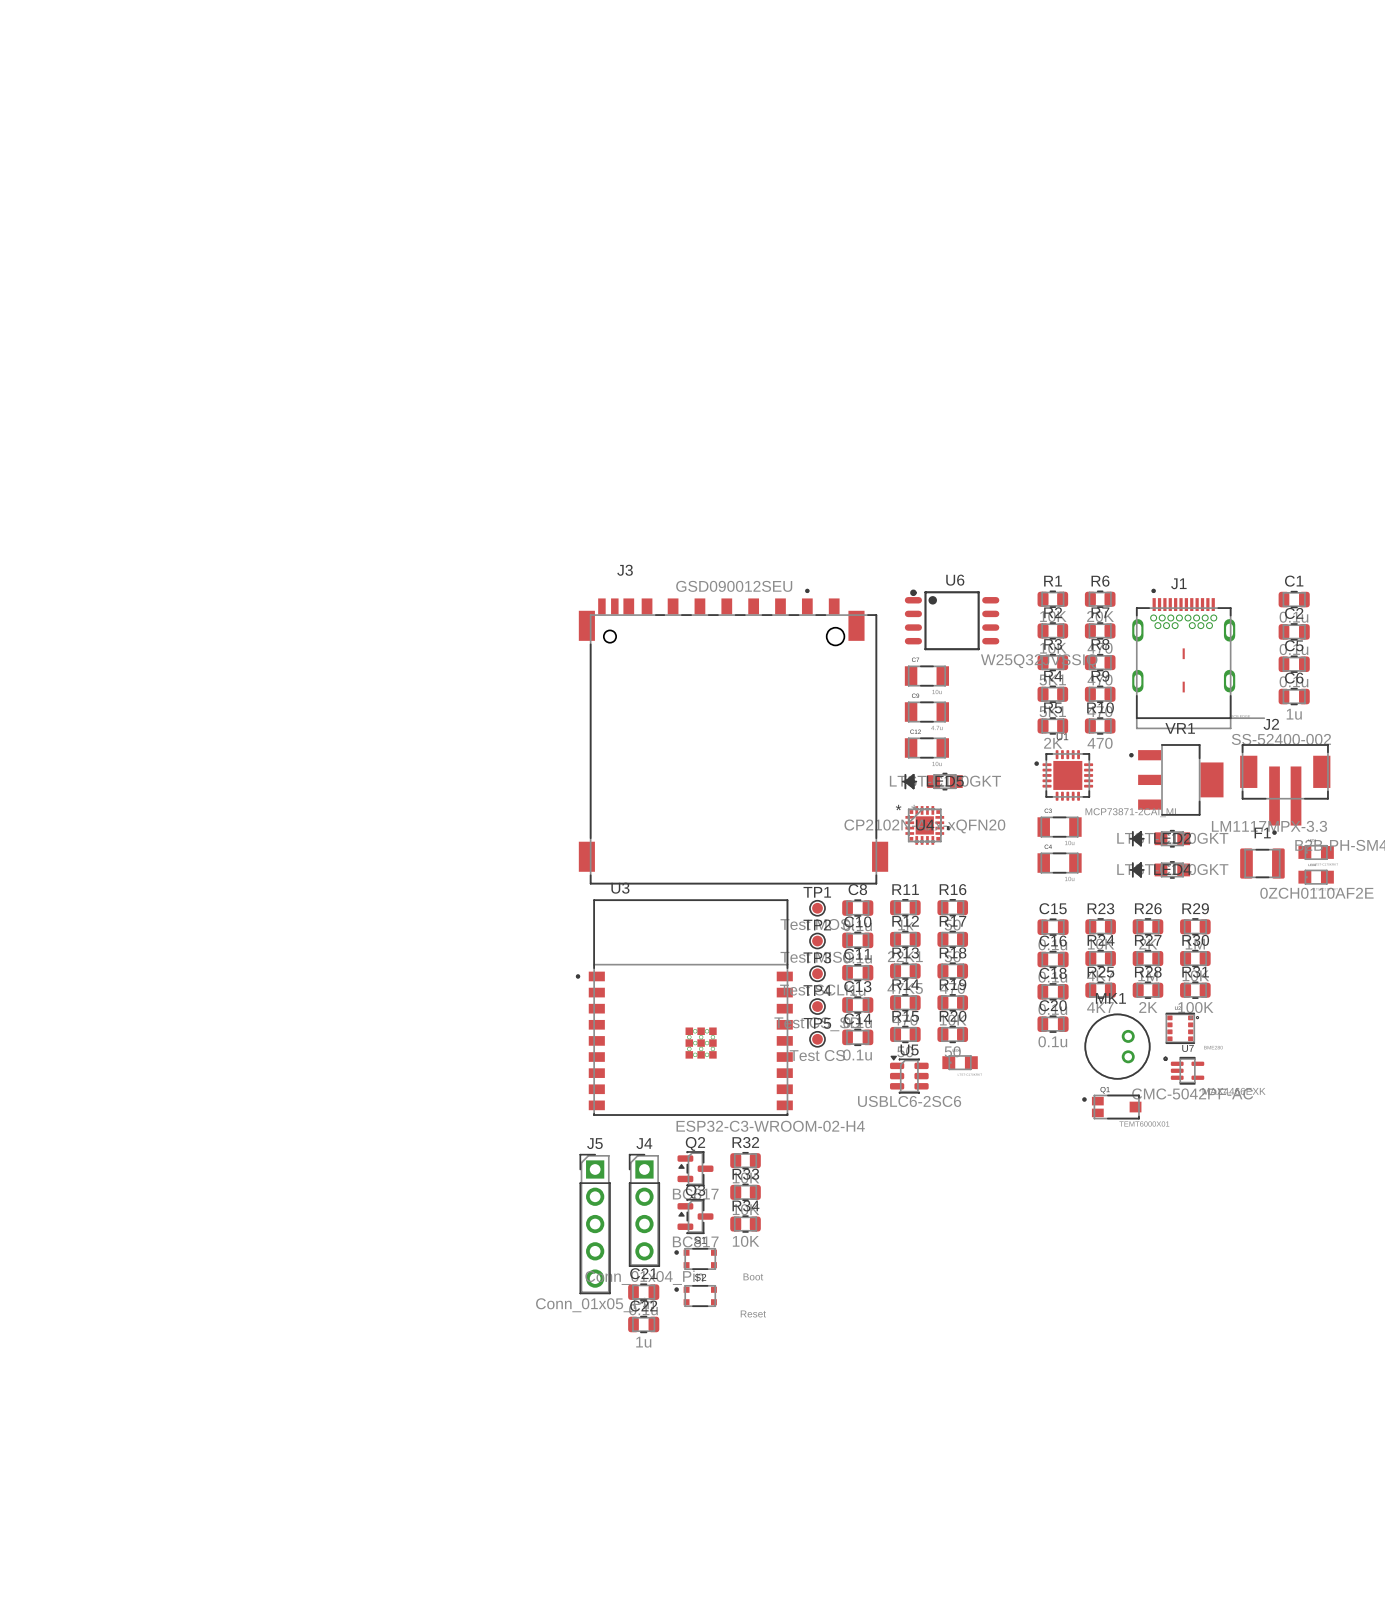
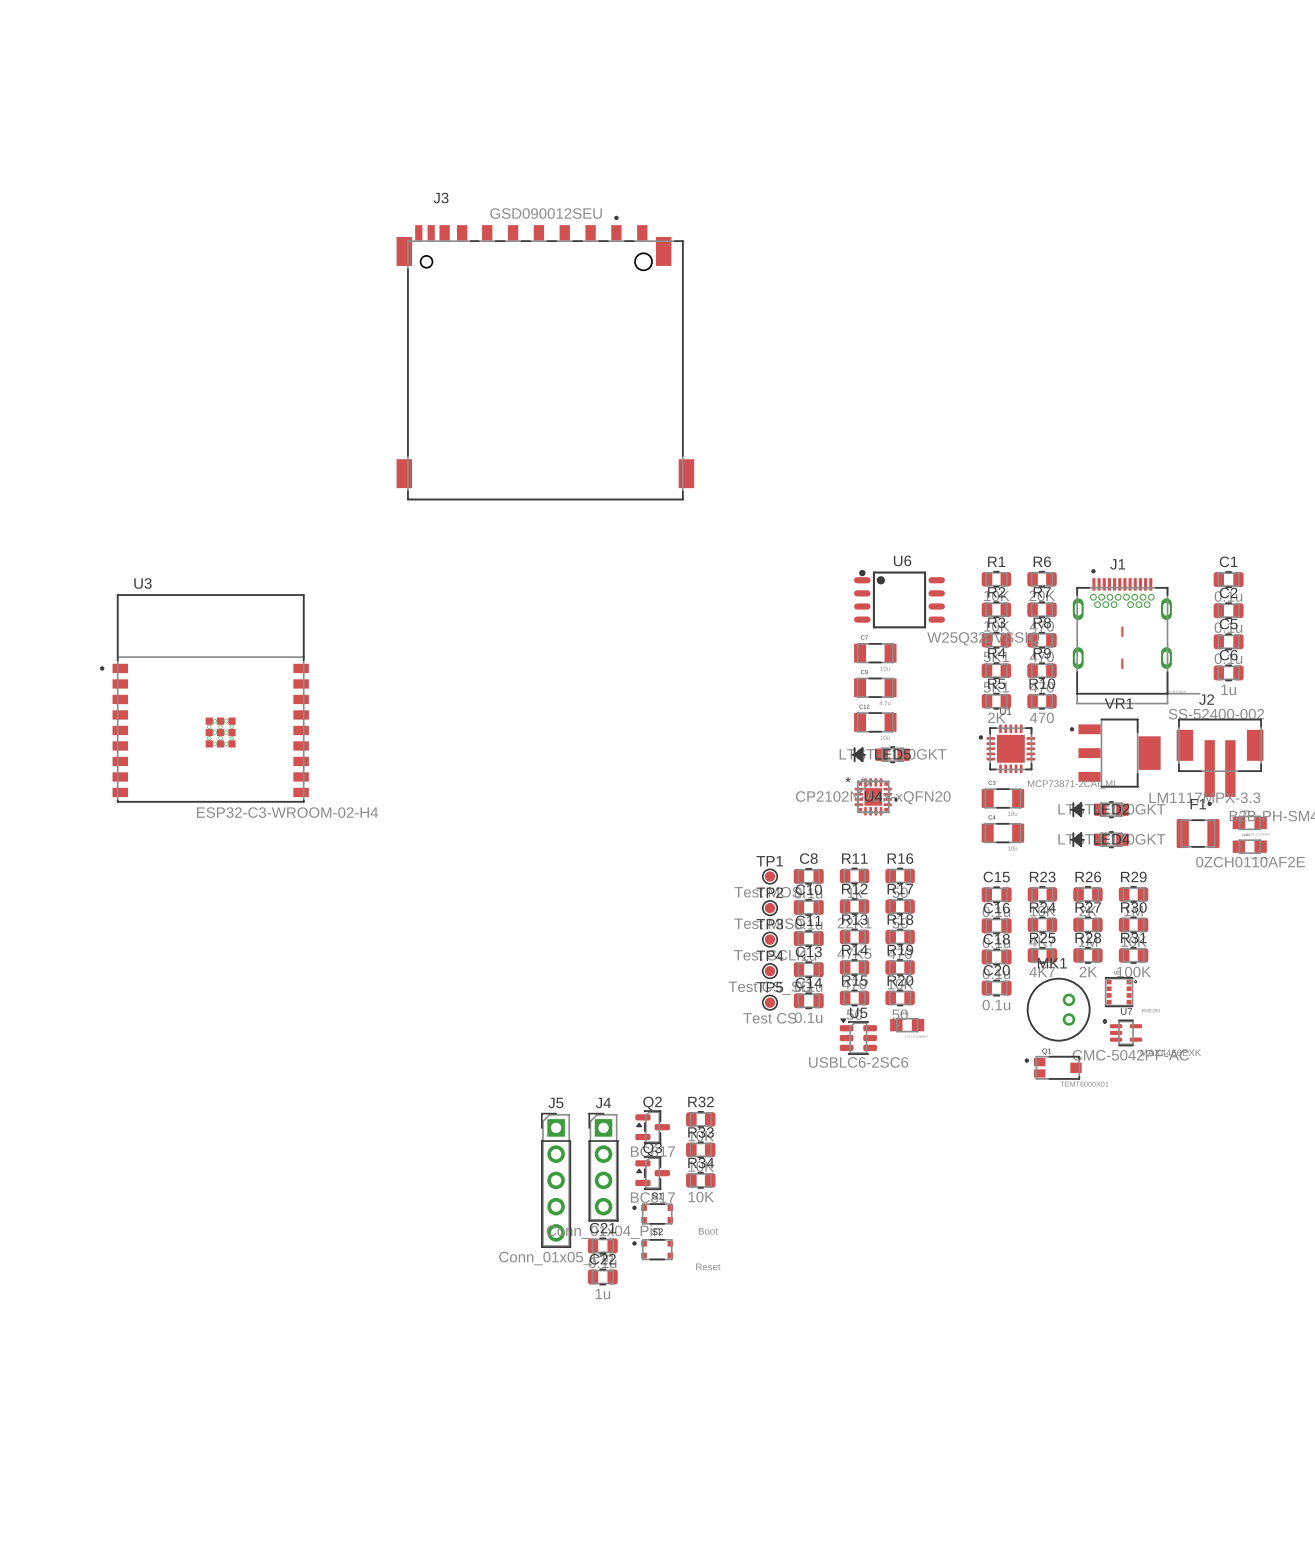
J3 position: (733, 736) -> (545, 357)
U3 position: (684, 1007) -> (204, 698)

